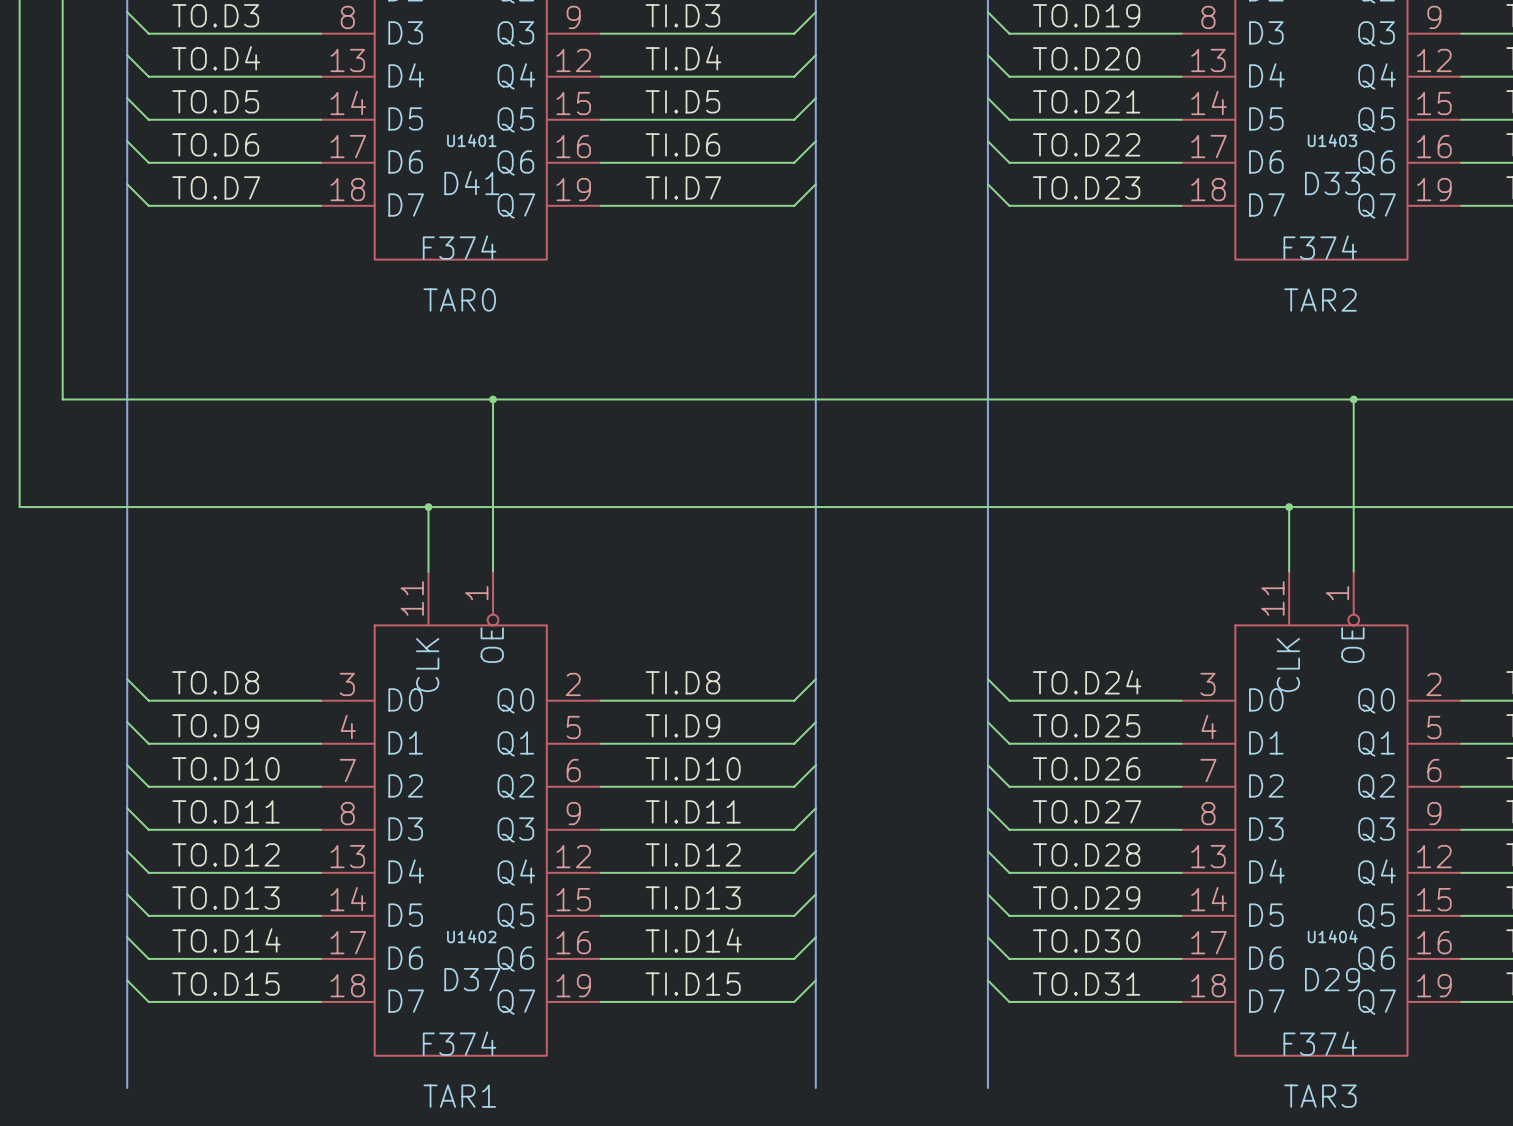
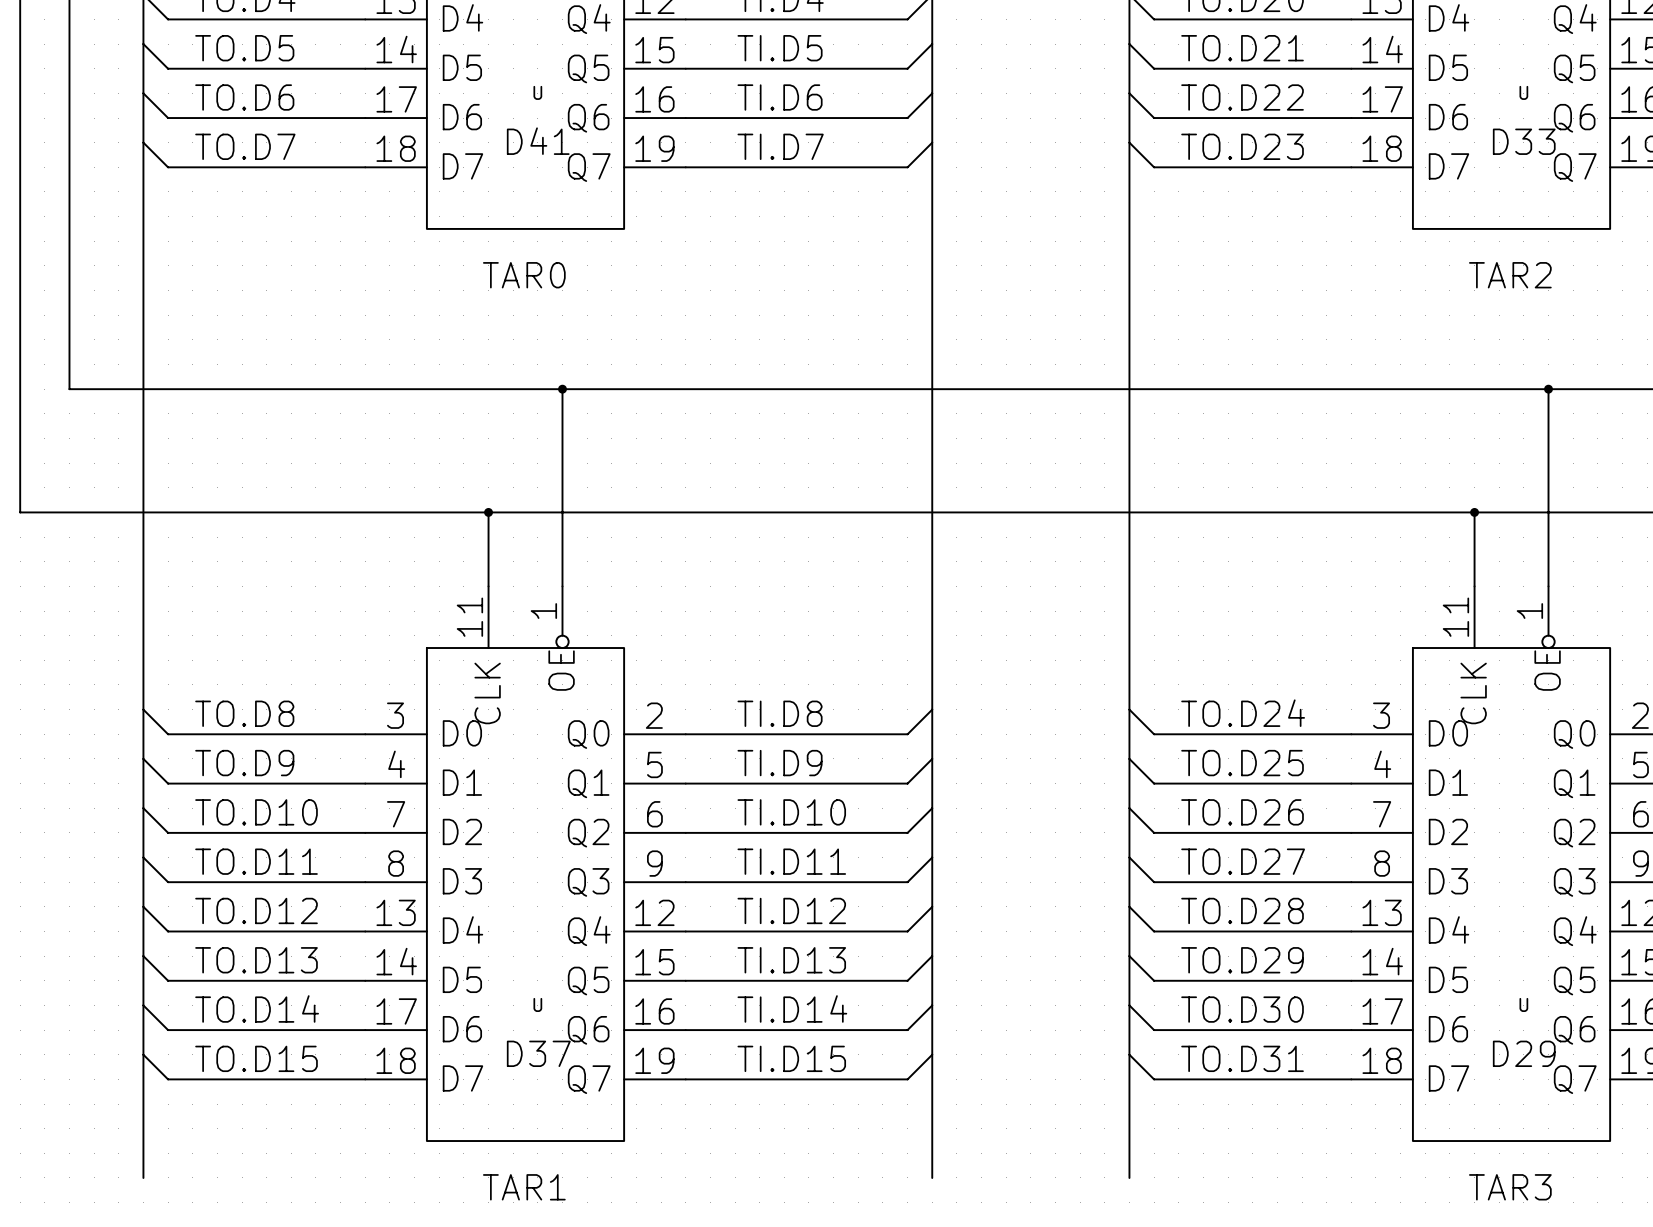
U1401 name: U1401 (471, 140) -> U (537, 92)
U1403 name: U1403 (1332, 140) -> U (1523, 92)
U1401 value: F374 (459, 247) -> none
U1403 value: F374 (1320, 247) -> none
U1402 name: U1402 (471, 936) -> U (537, 1004)
U1404 name: U1404 (1332, 936) -> U (1523, 1004)
U1402 value: F374 (459, 1043) -> none
U1404 value: F374 (1320, 1043) -> none

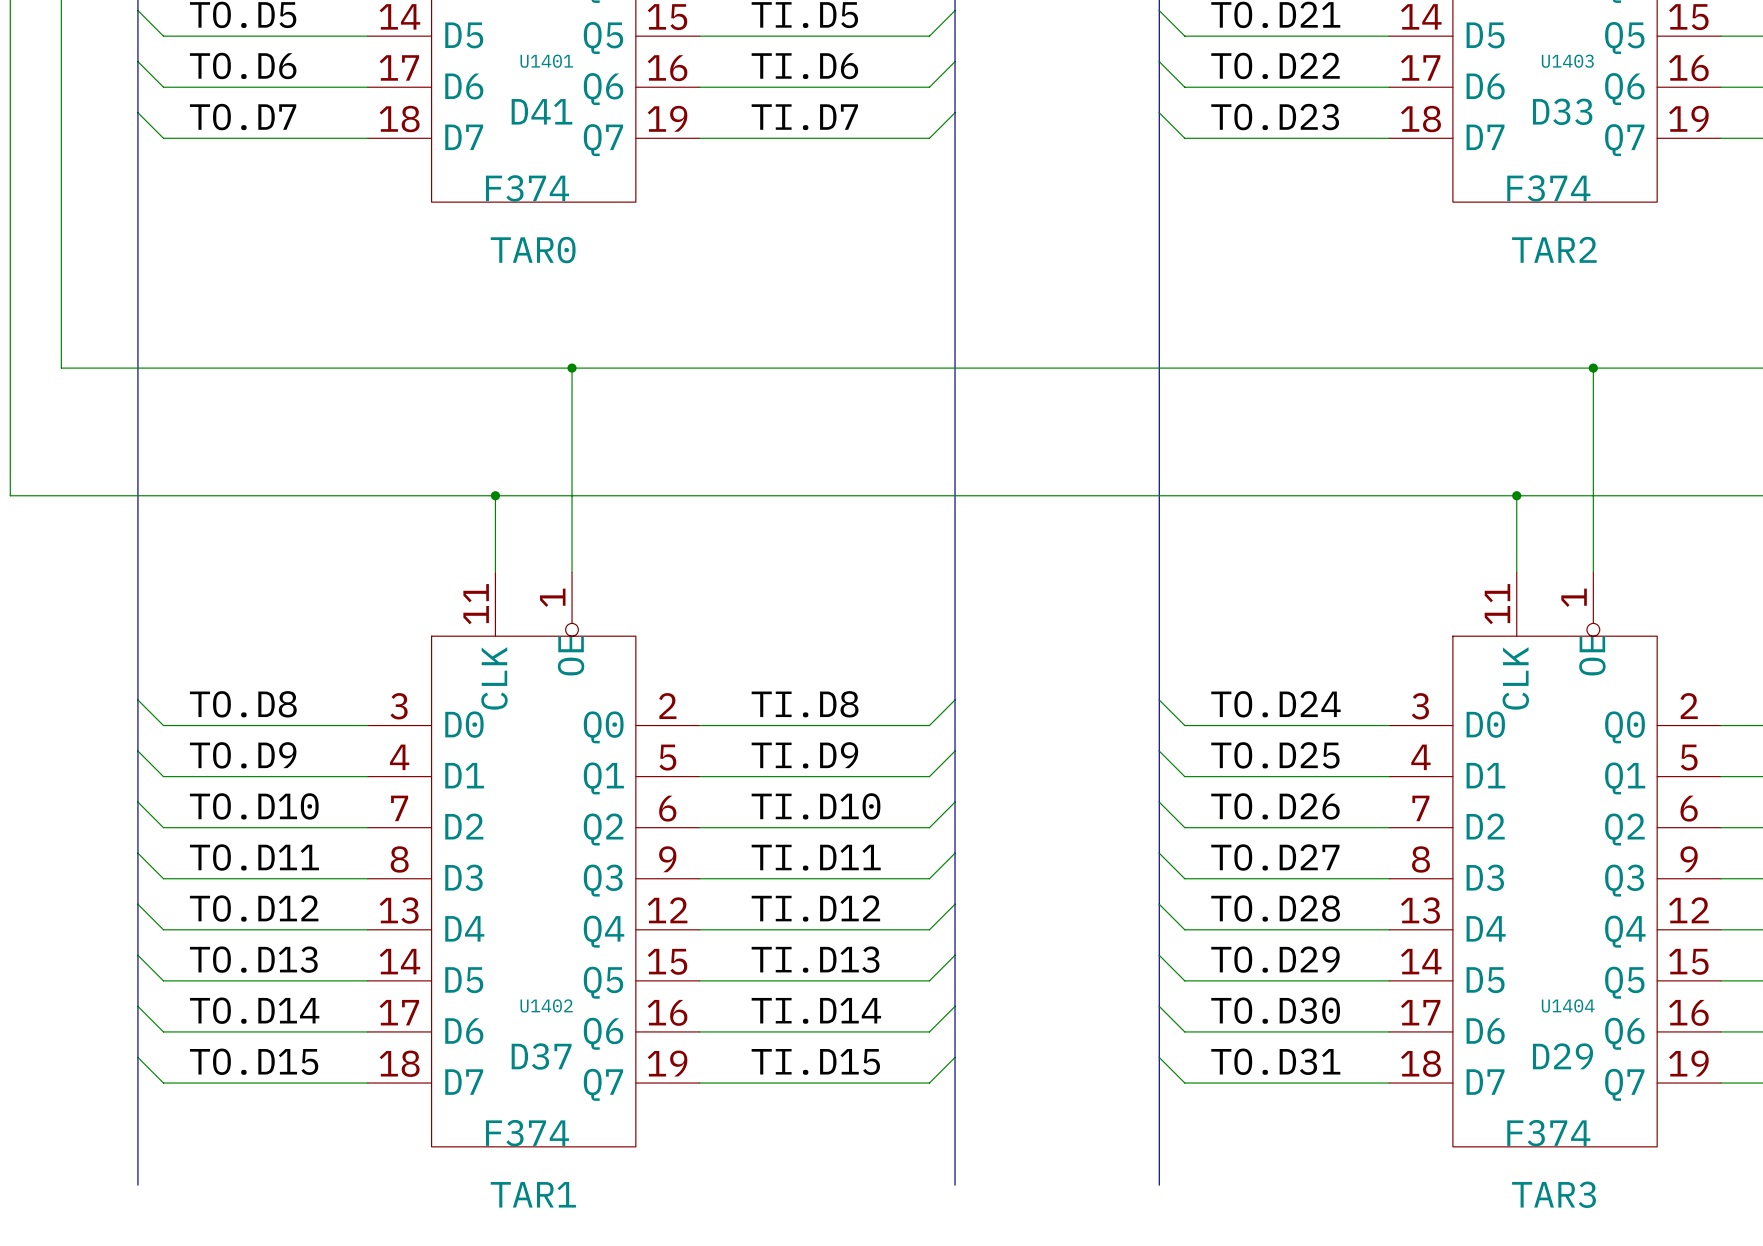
U name: U (537, 92) -> U1401 (546, 61)
U name: U (1523, 92) -> U1403 (1567, 61)
U value: none -> F374 (527, 188)
U value: none -> F374 (1548, 188)
U name: U (537, 1004) -> U1402 (546, 1005)
U name: U (1523, 1004) -> U1404 (1568, 1005)
U value: none -> F374 (527, 1133)
U value: none -> F374 (1548, 1133)

